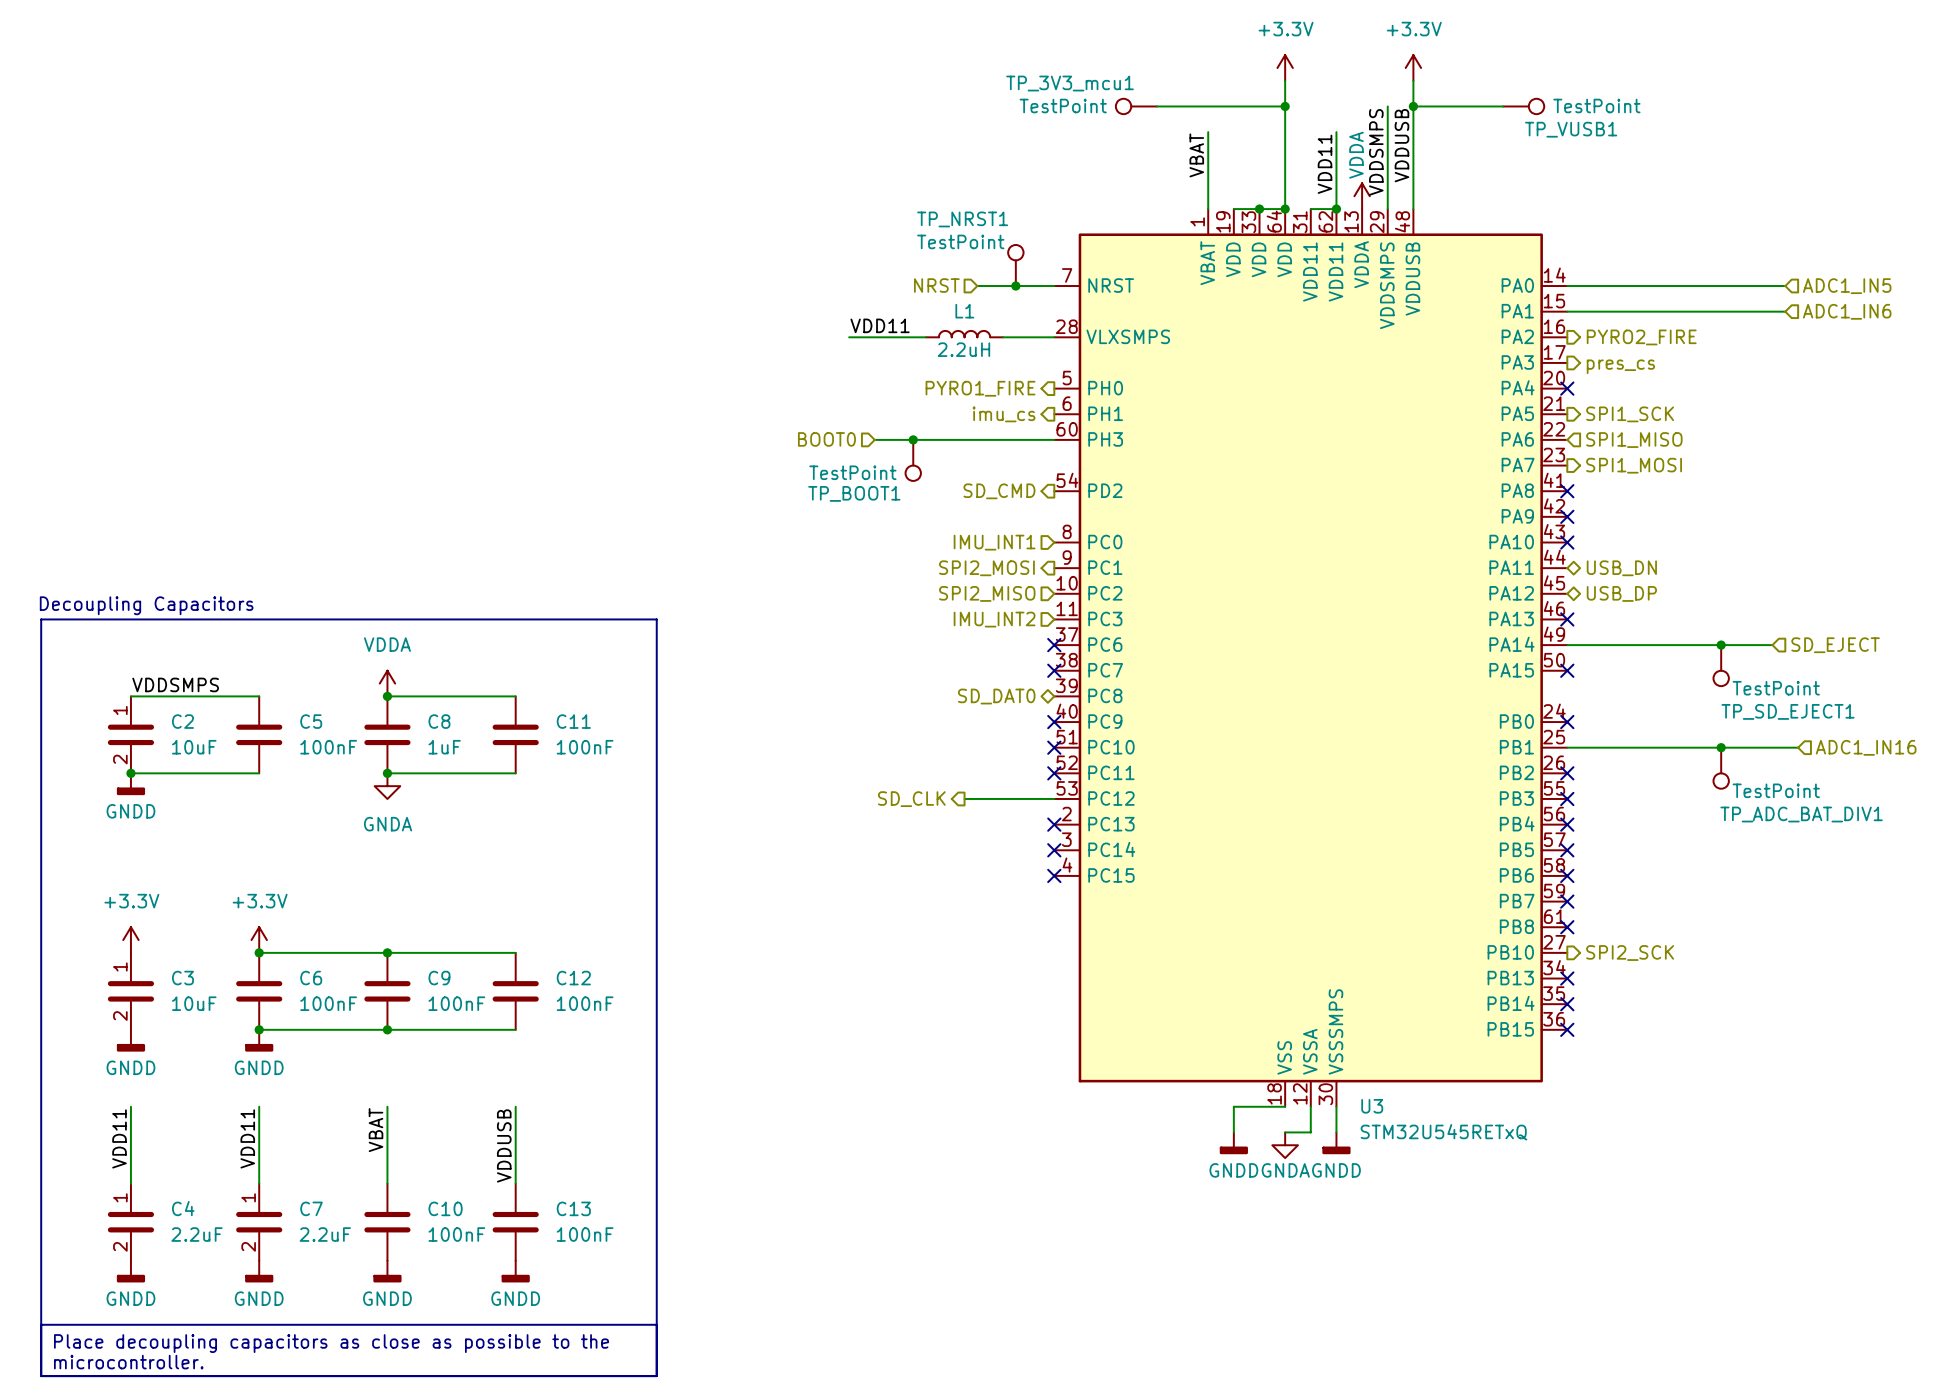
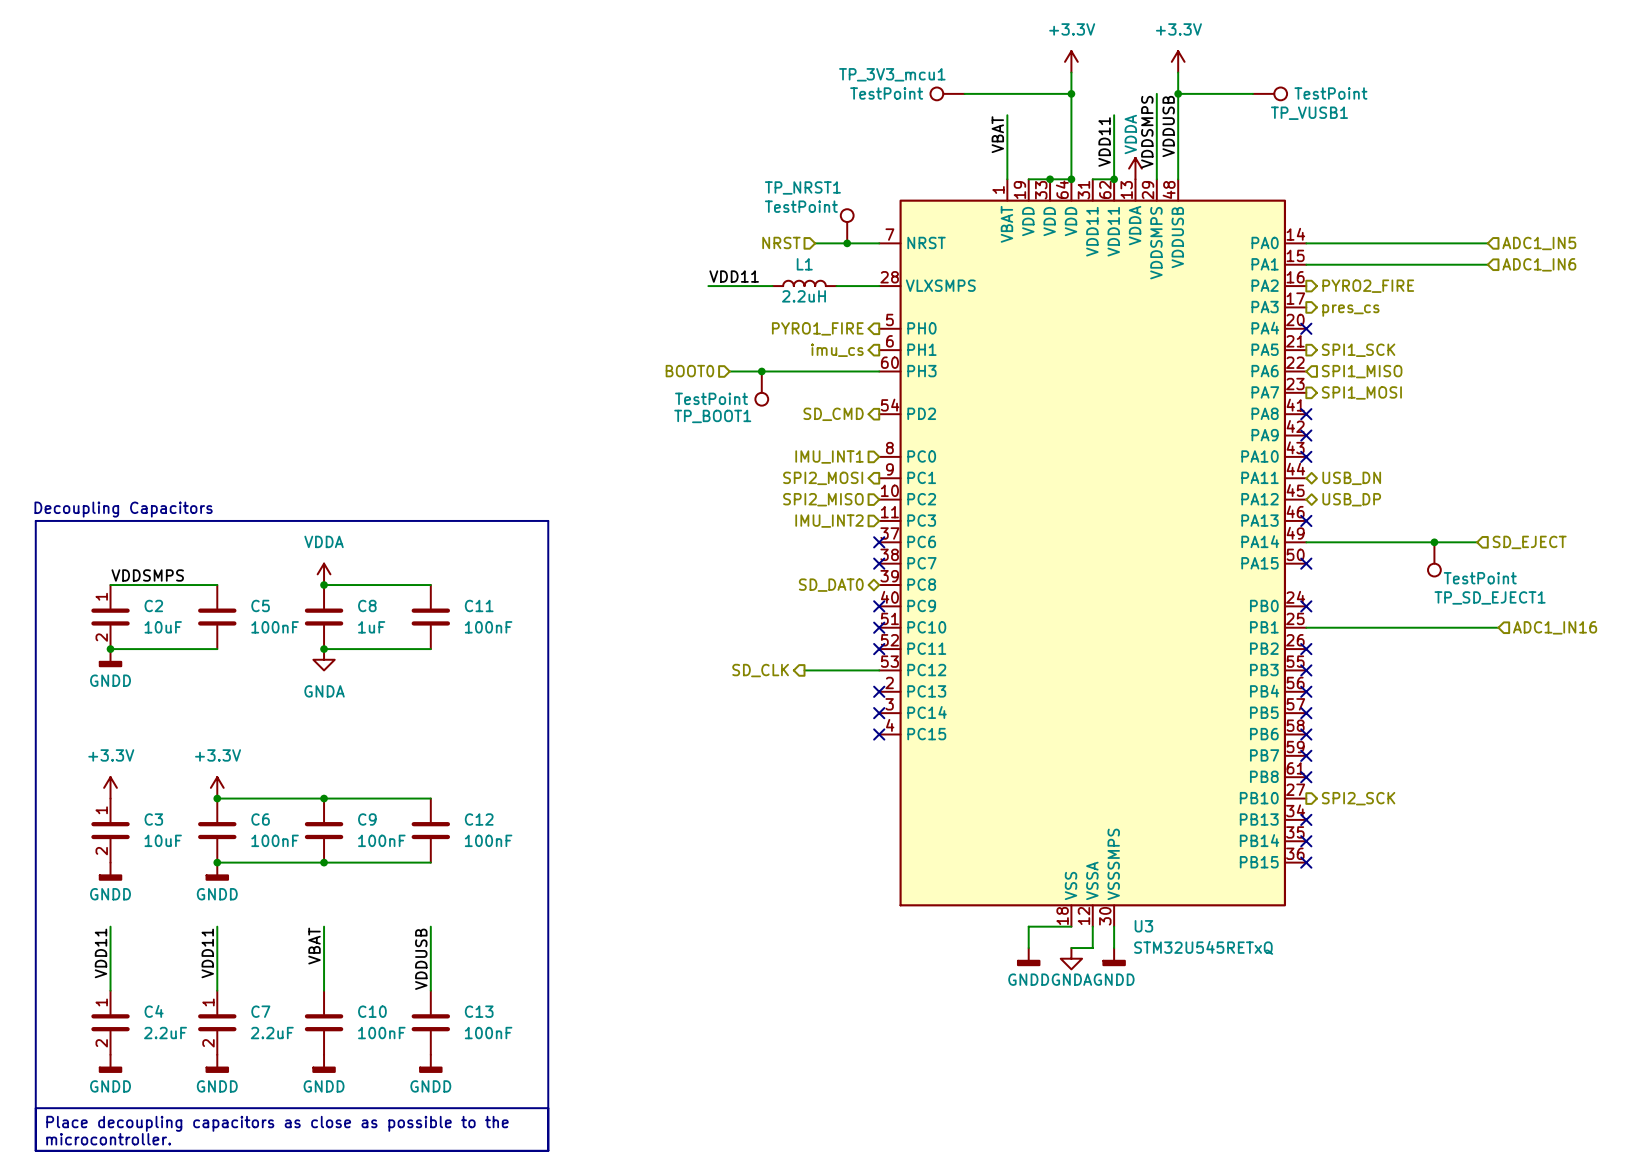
junction: (1721, 747) -> none
TP_ADC_BAT_DIV1: TestPoint (1721, 768) -> none

